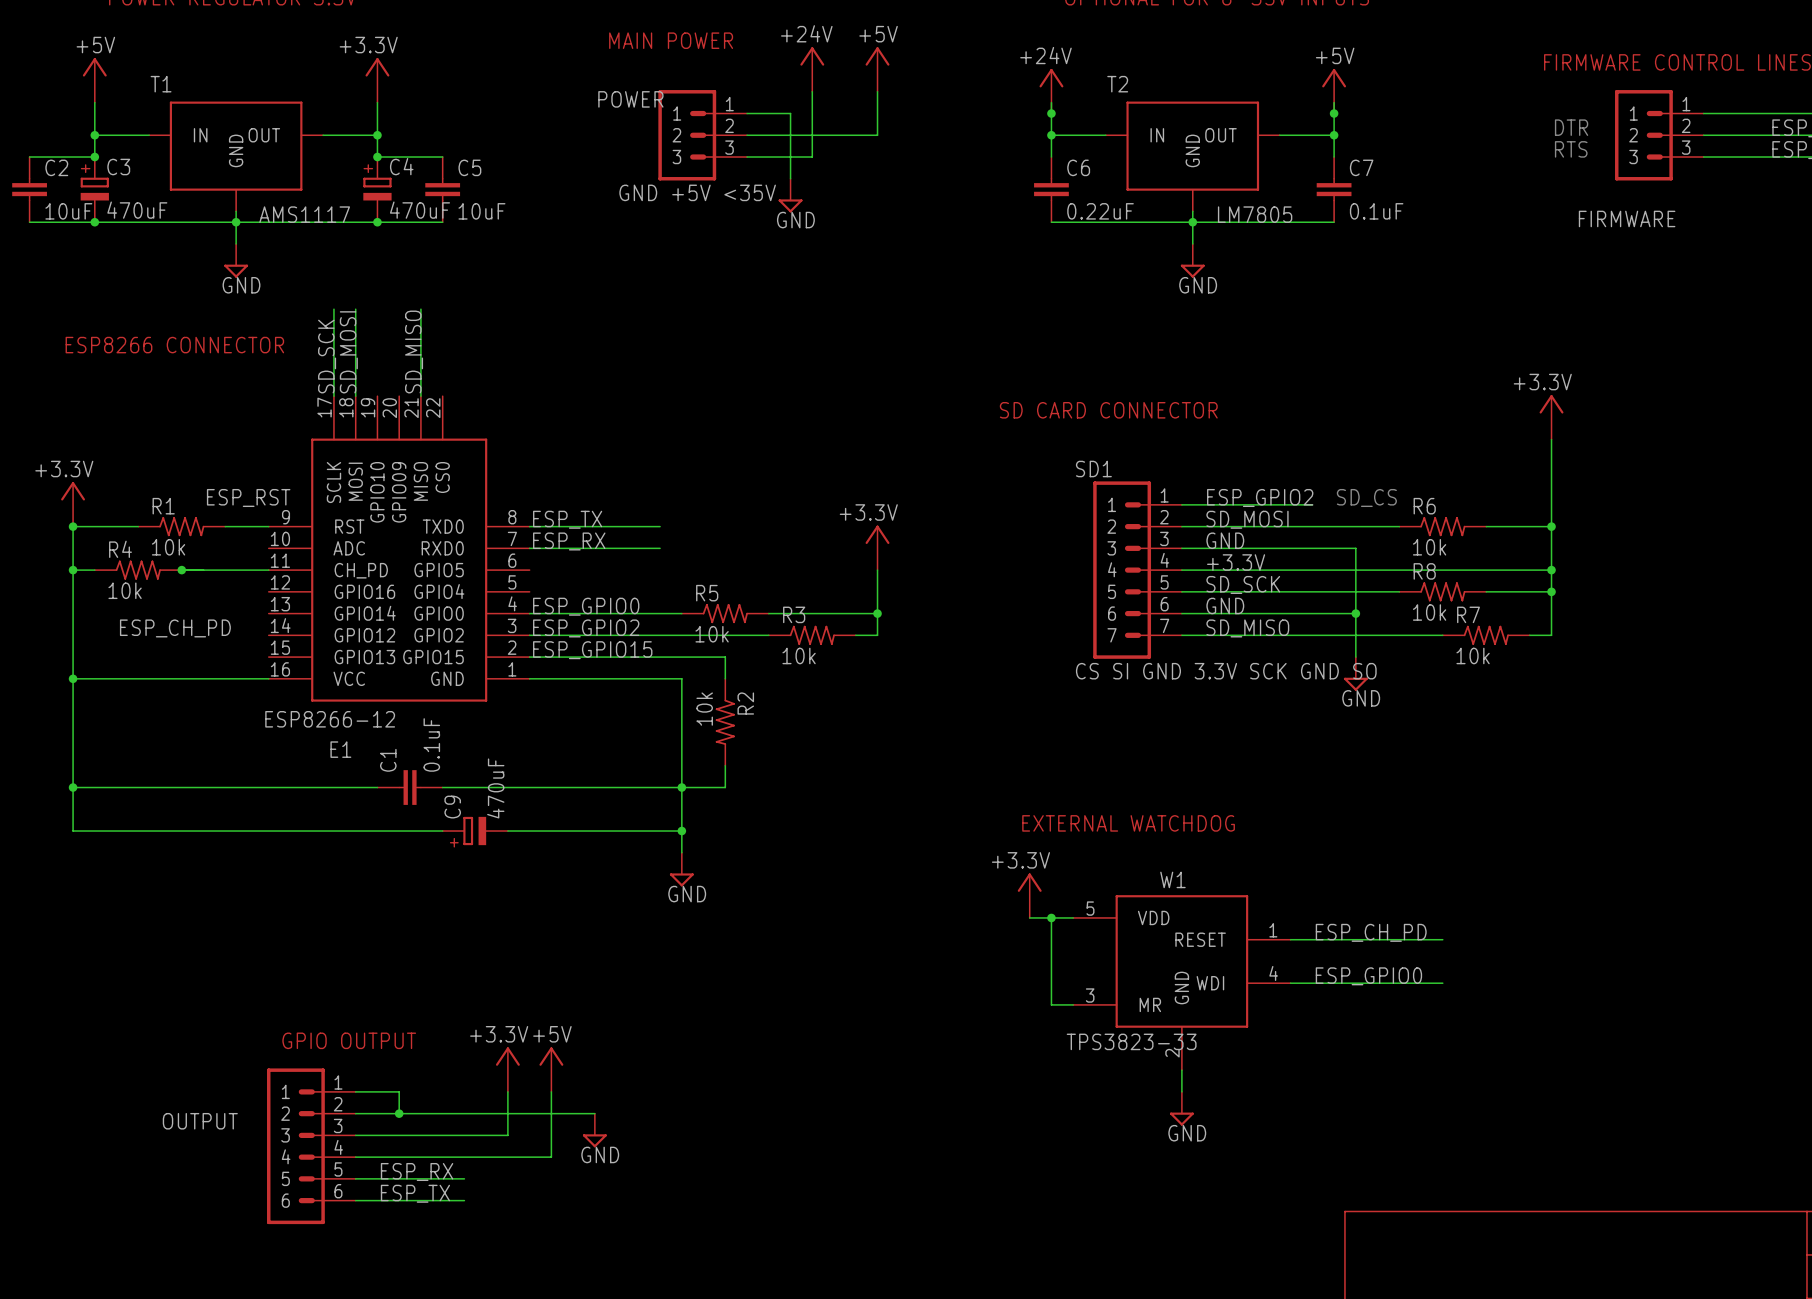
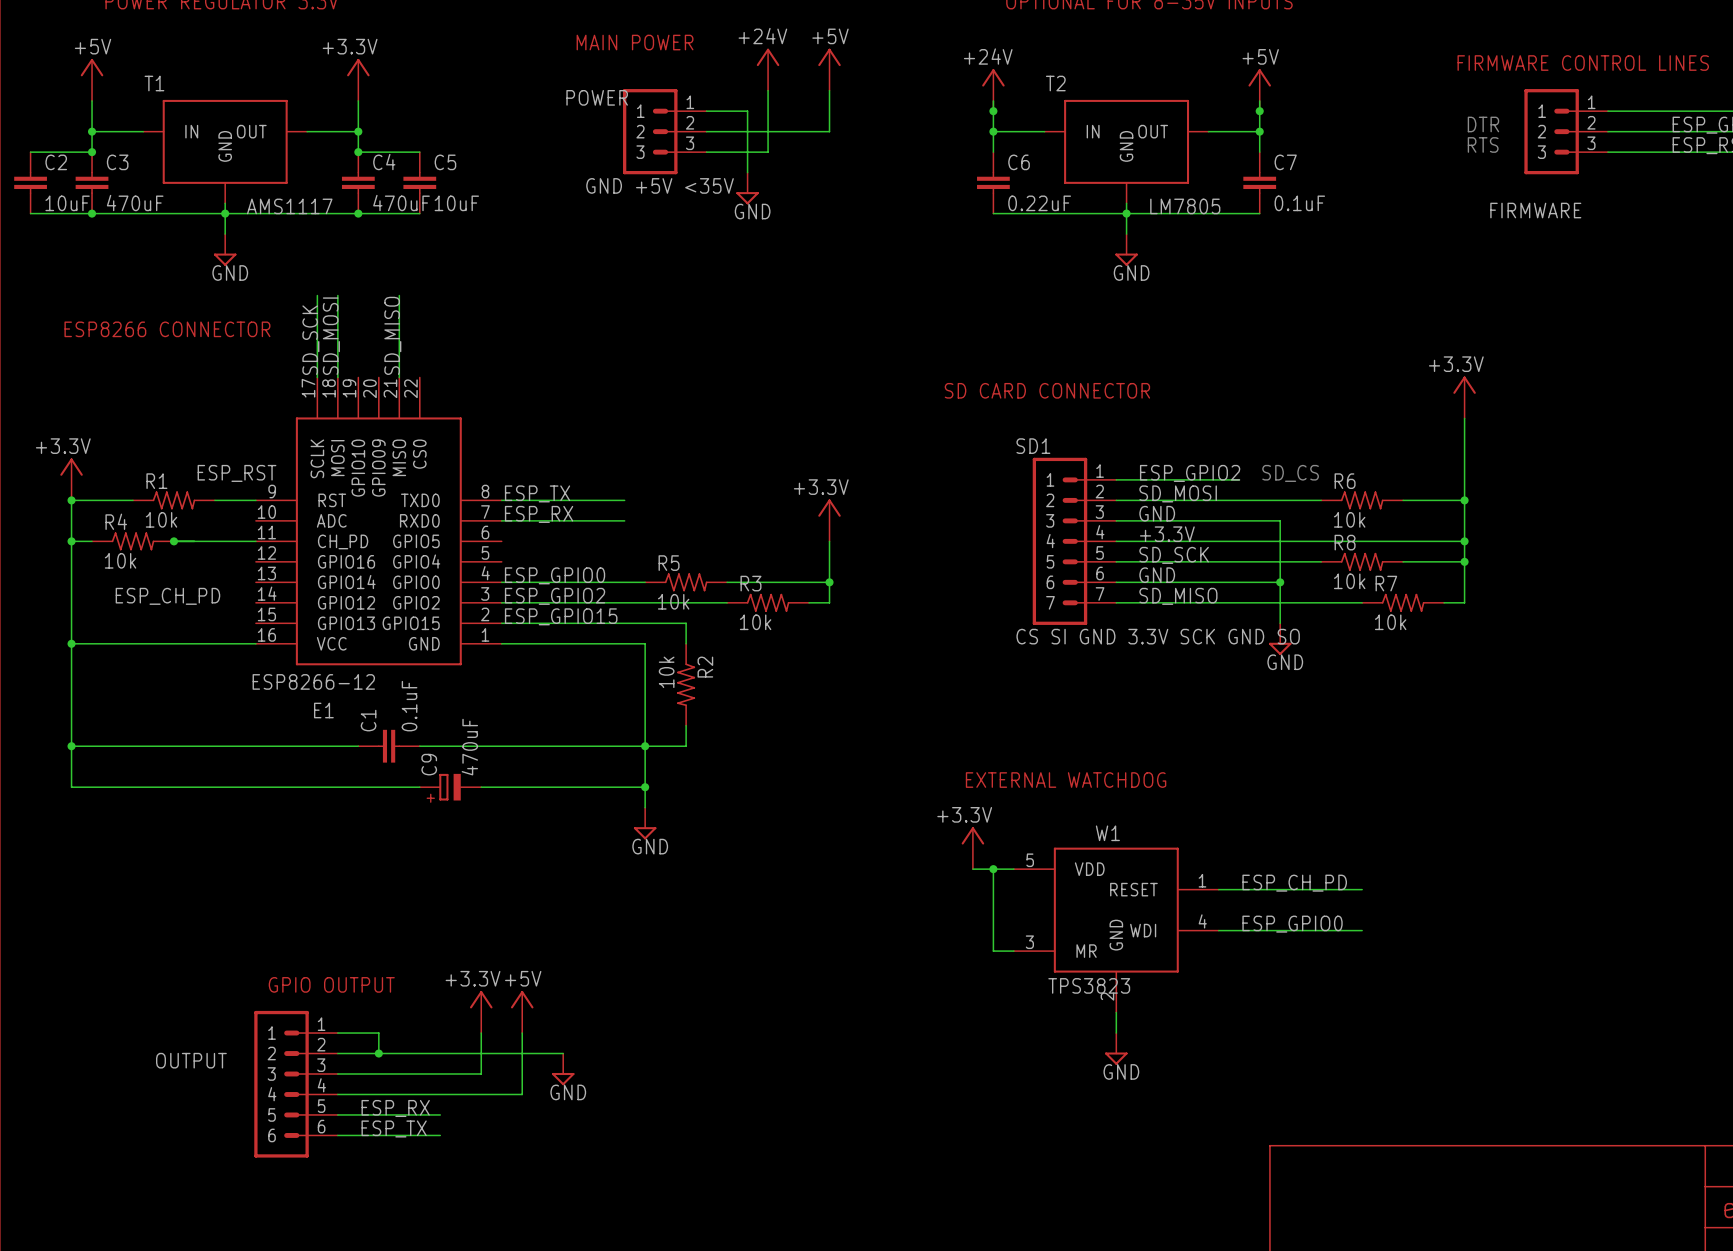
C3 symbol: [80, 157, 109, 223] -> [75, 152, 109, 214]
C4 symbol: [363, 157, 392, 223] -> [341, 152, 375, 214]
W1 value: TPS3823-33 (1131, 1041) -> TPS3823 (1089, 985)

